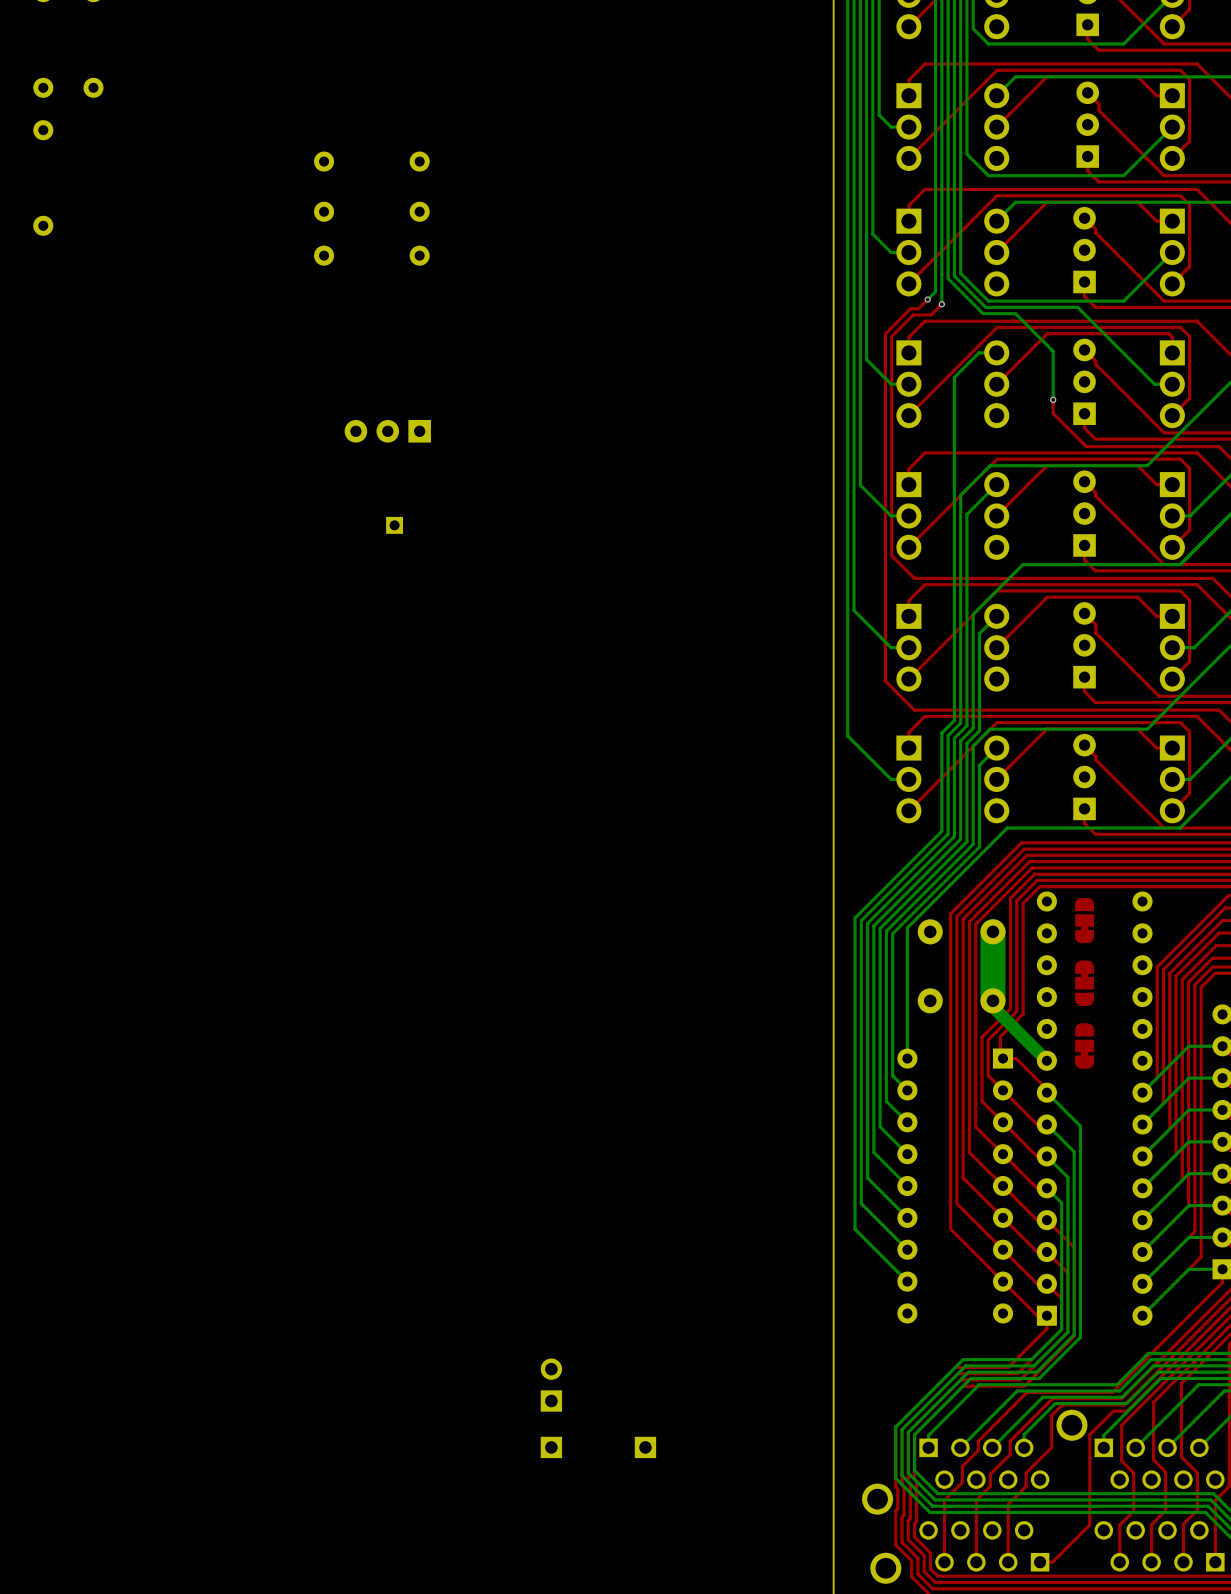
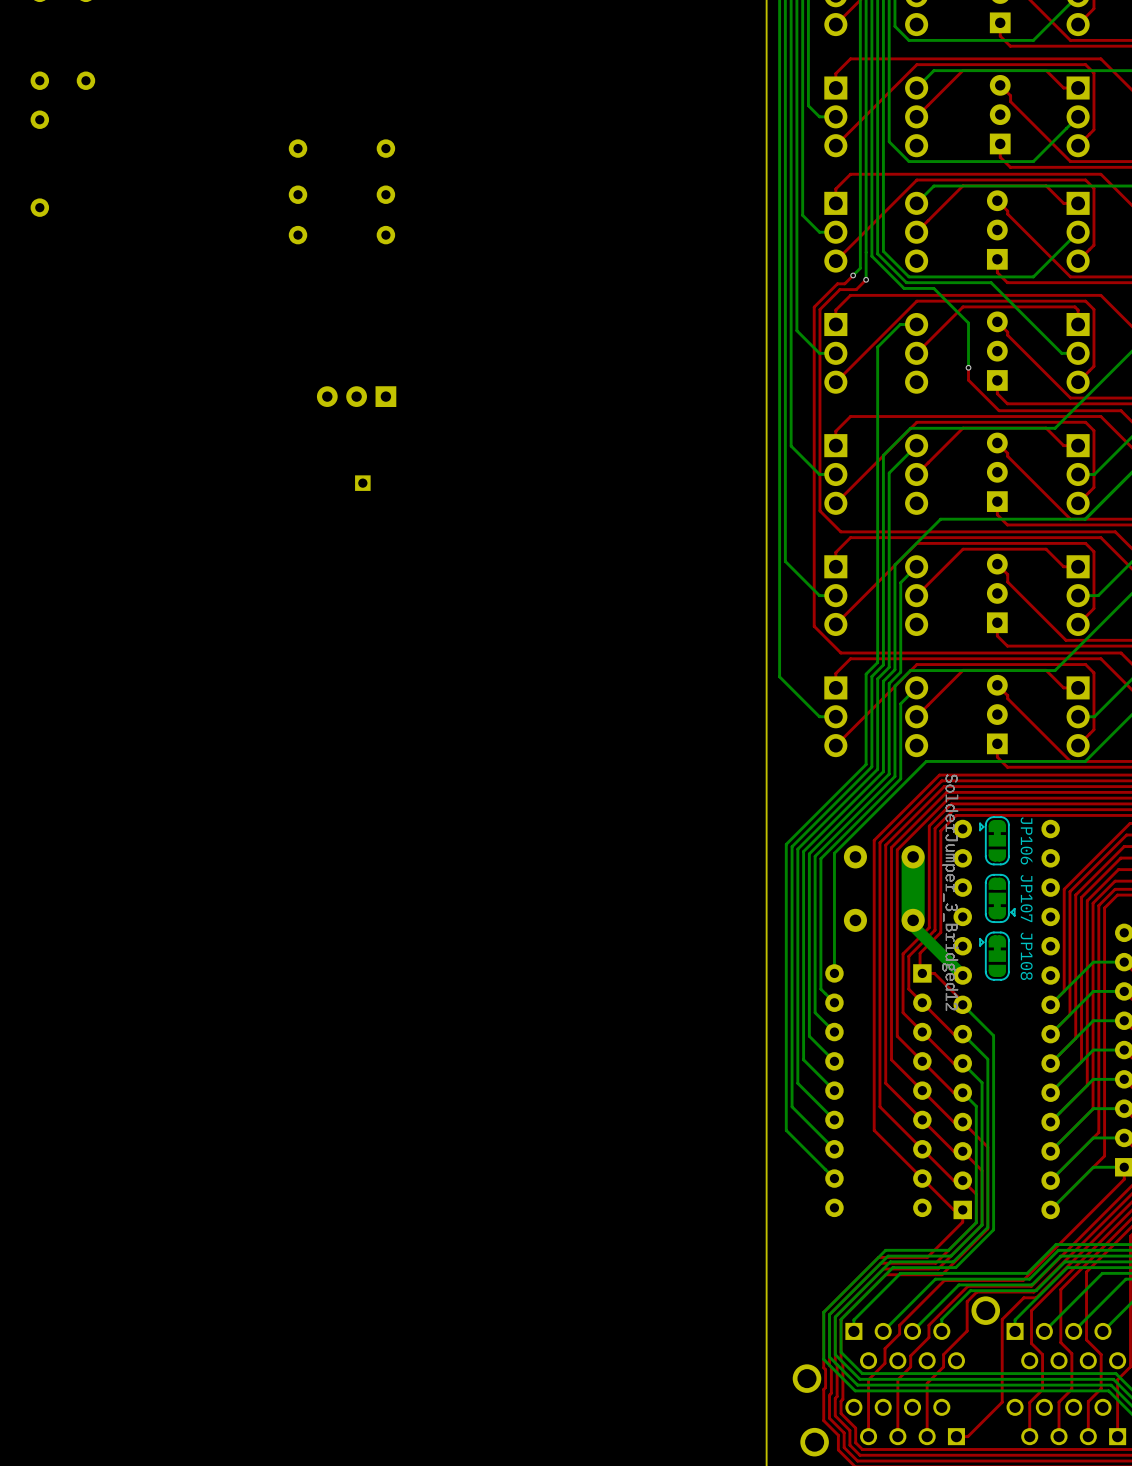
JP108 side: top (1084, 920) -> bottom (994, 956)
JP107 side: top (1084, 983) -> bottom (1000, 898)
JP106 side: top (1084, 1046) -> bottom (994, 840)
part: (551, 1385) -> none
part: (551, 1447) -> none
part: (645, 1447) -> none

